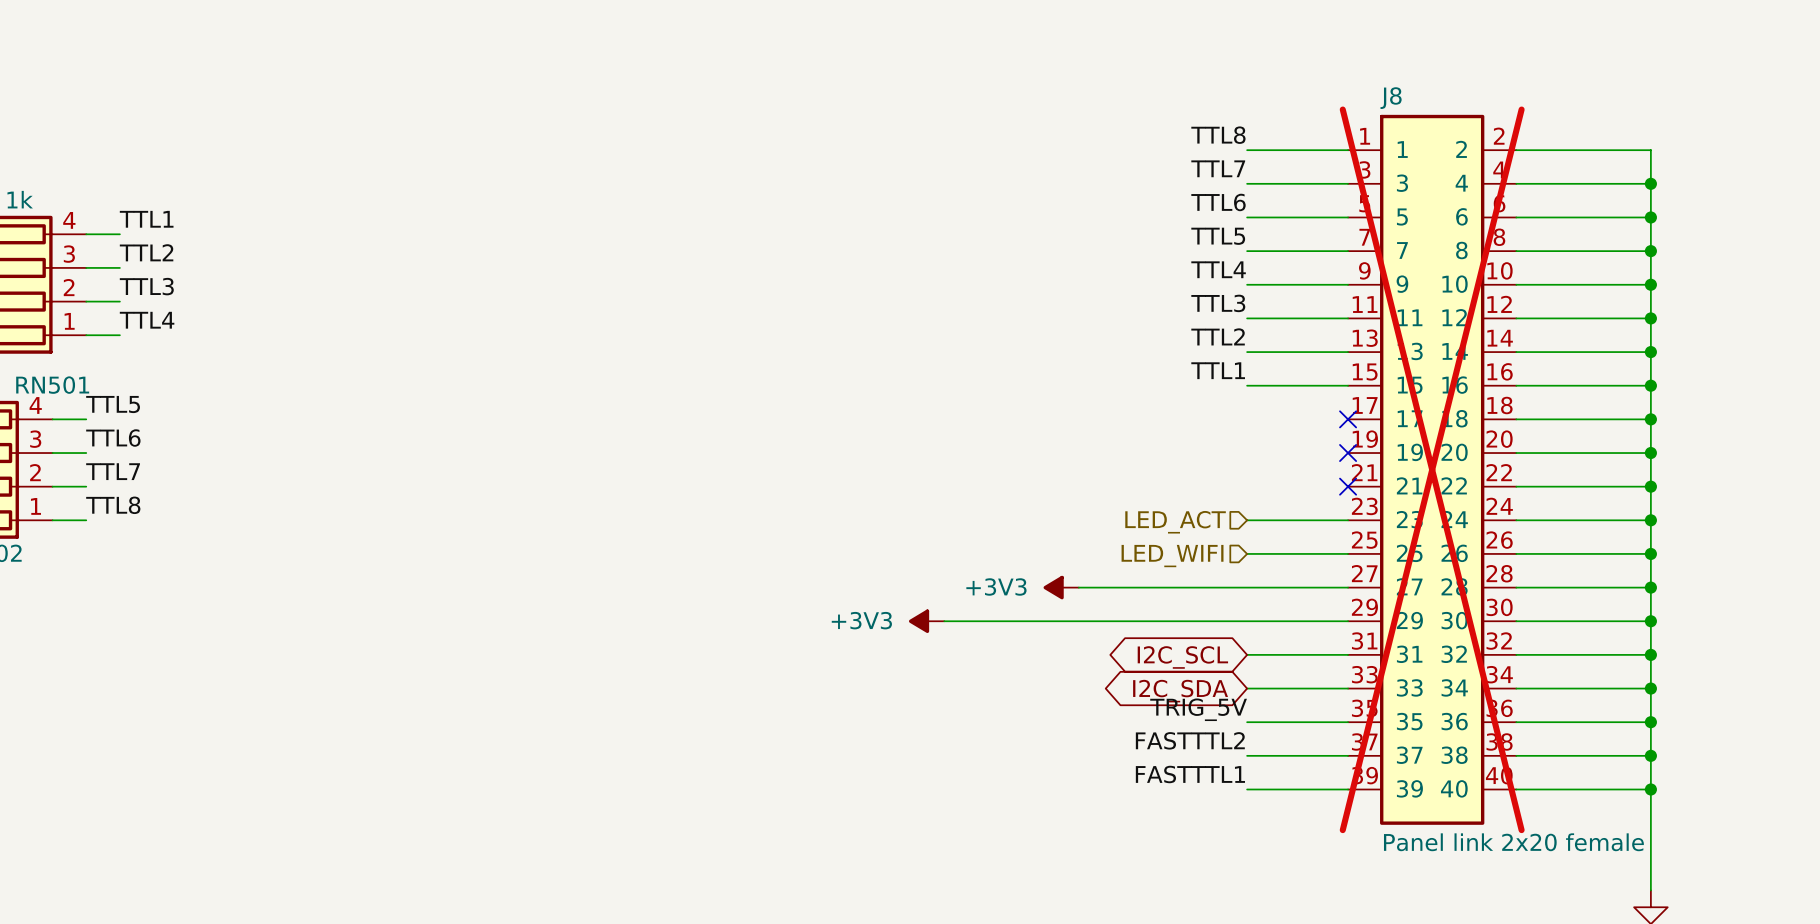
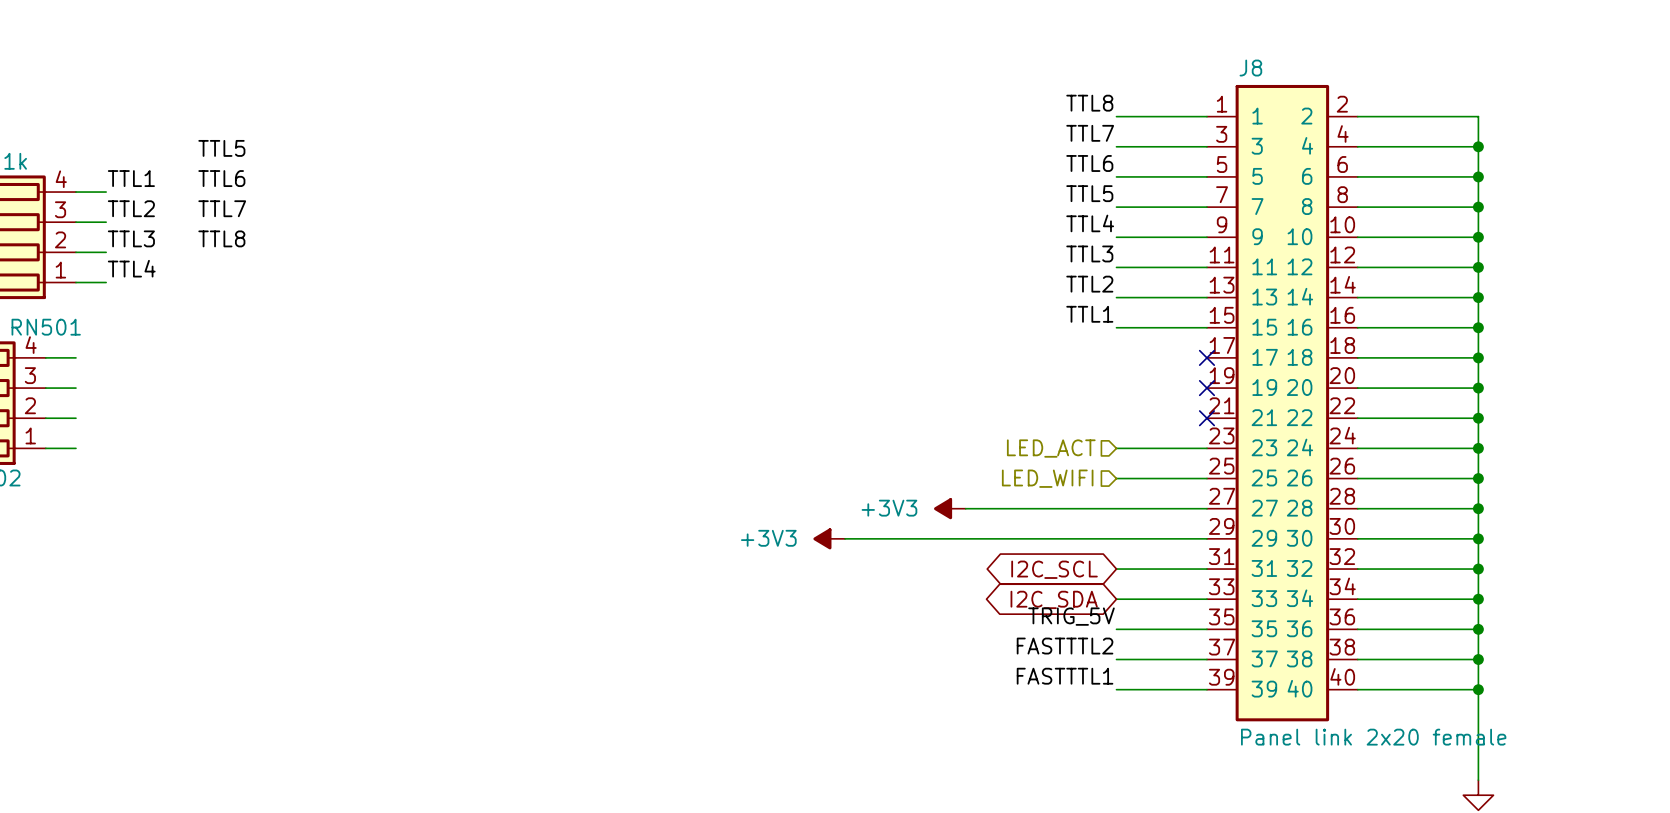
label position: TTL5 (113, 404) -> TTL5 (221, 148)
label position: TTL6 (113, 438) -> TTL6 (221, 178)
J8 do-not-place cross: (1432, 469) -> none
label position: TTL7 (113, 471) -> TTL7 (222, 208)
label position: TTL8 (113, 505) -> TTL8 (221, 238)

